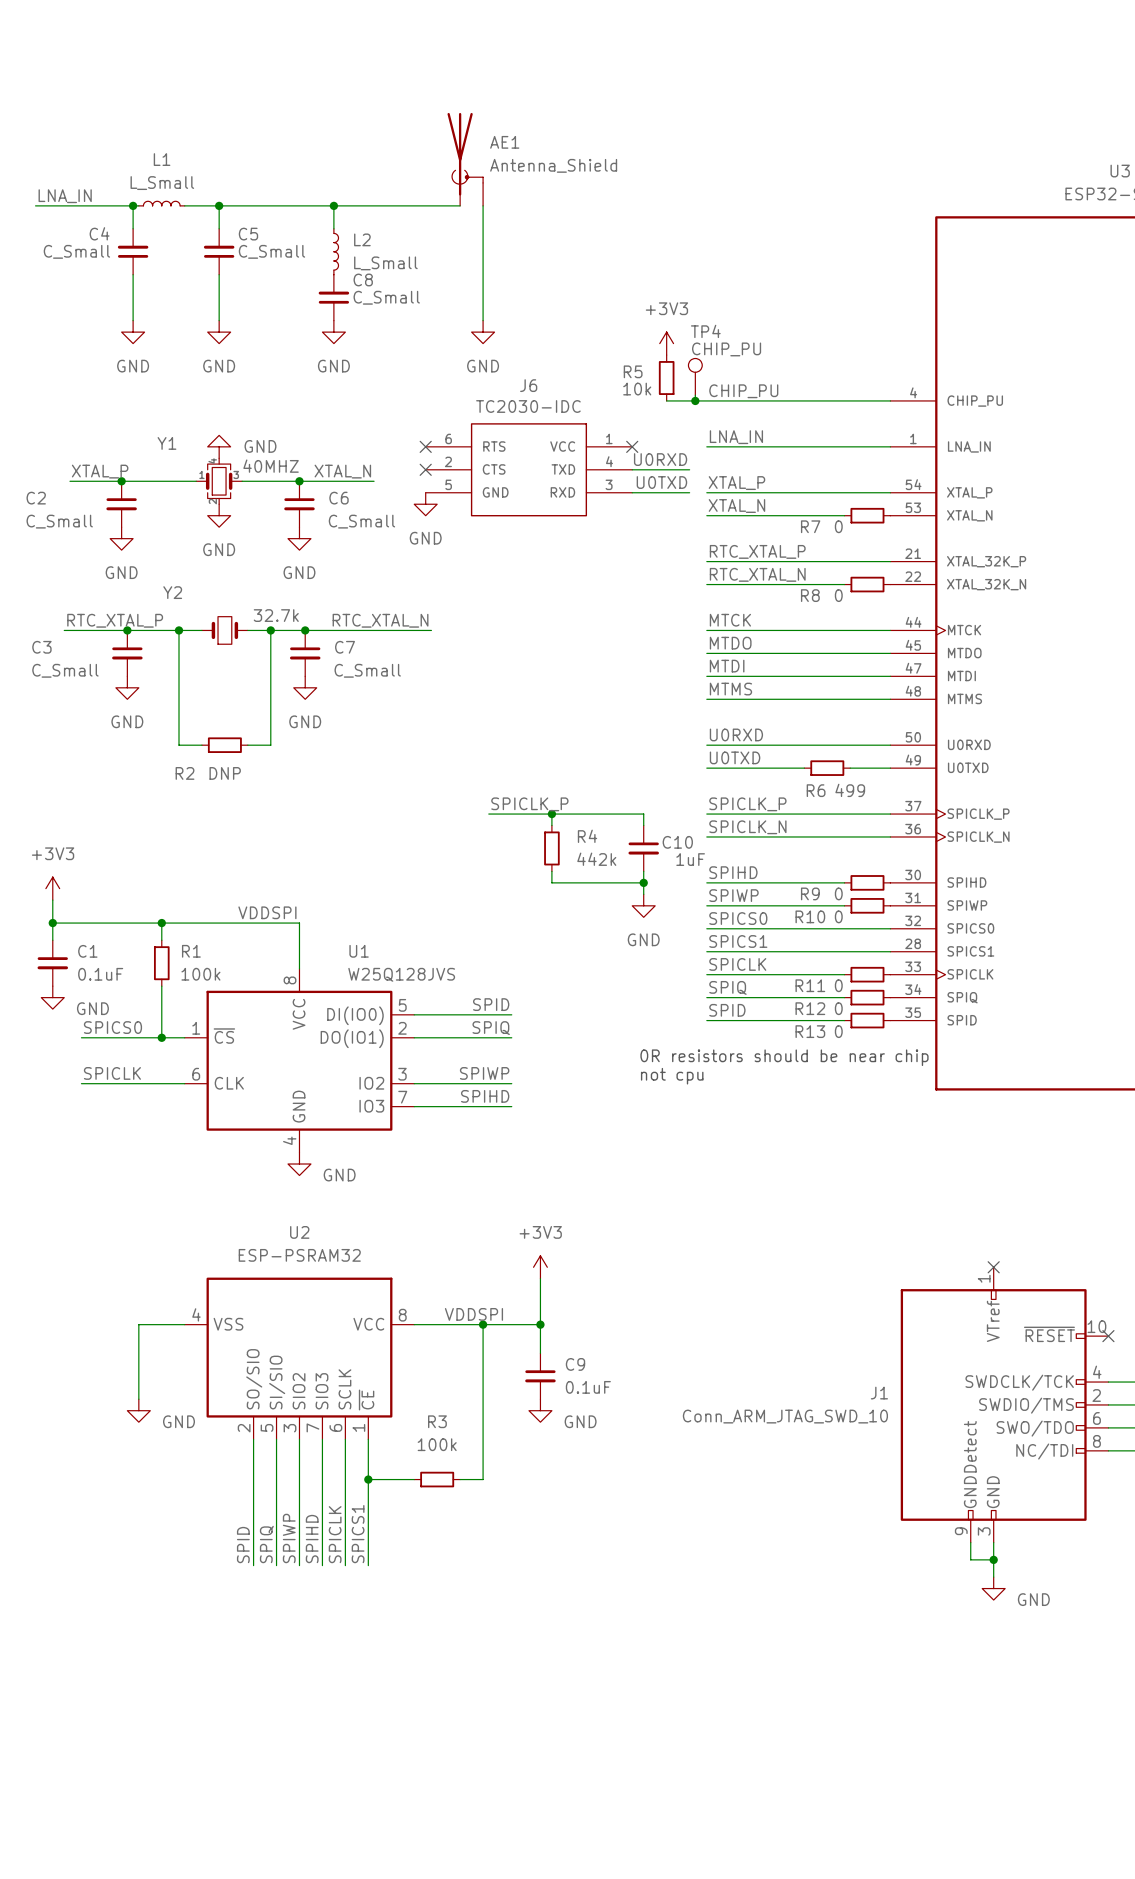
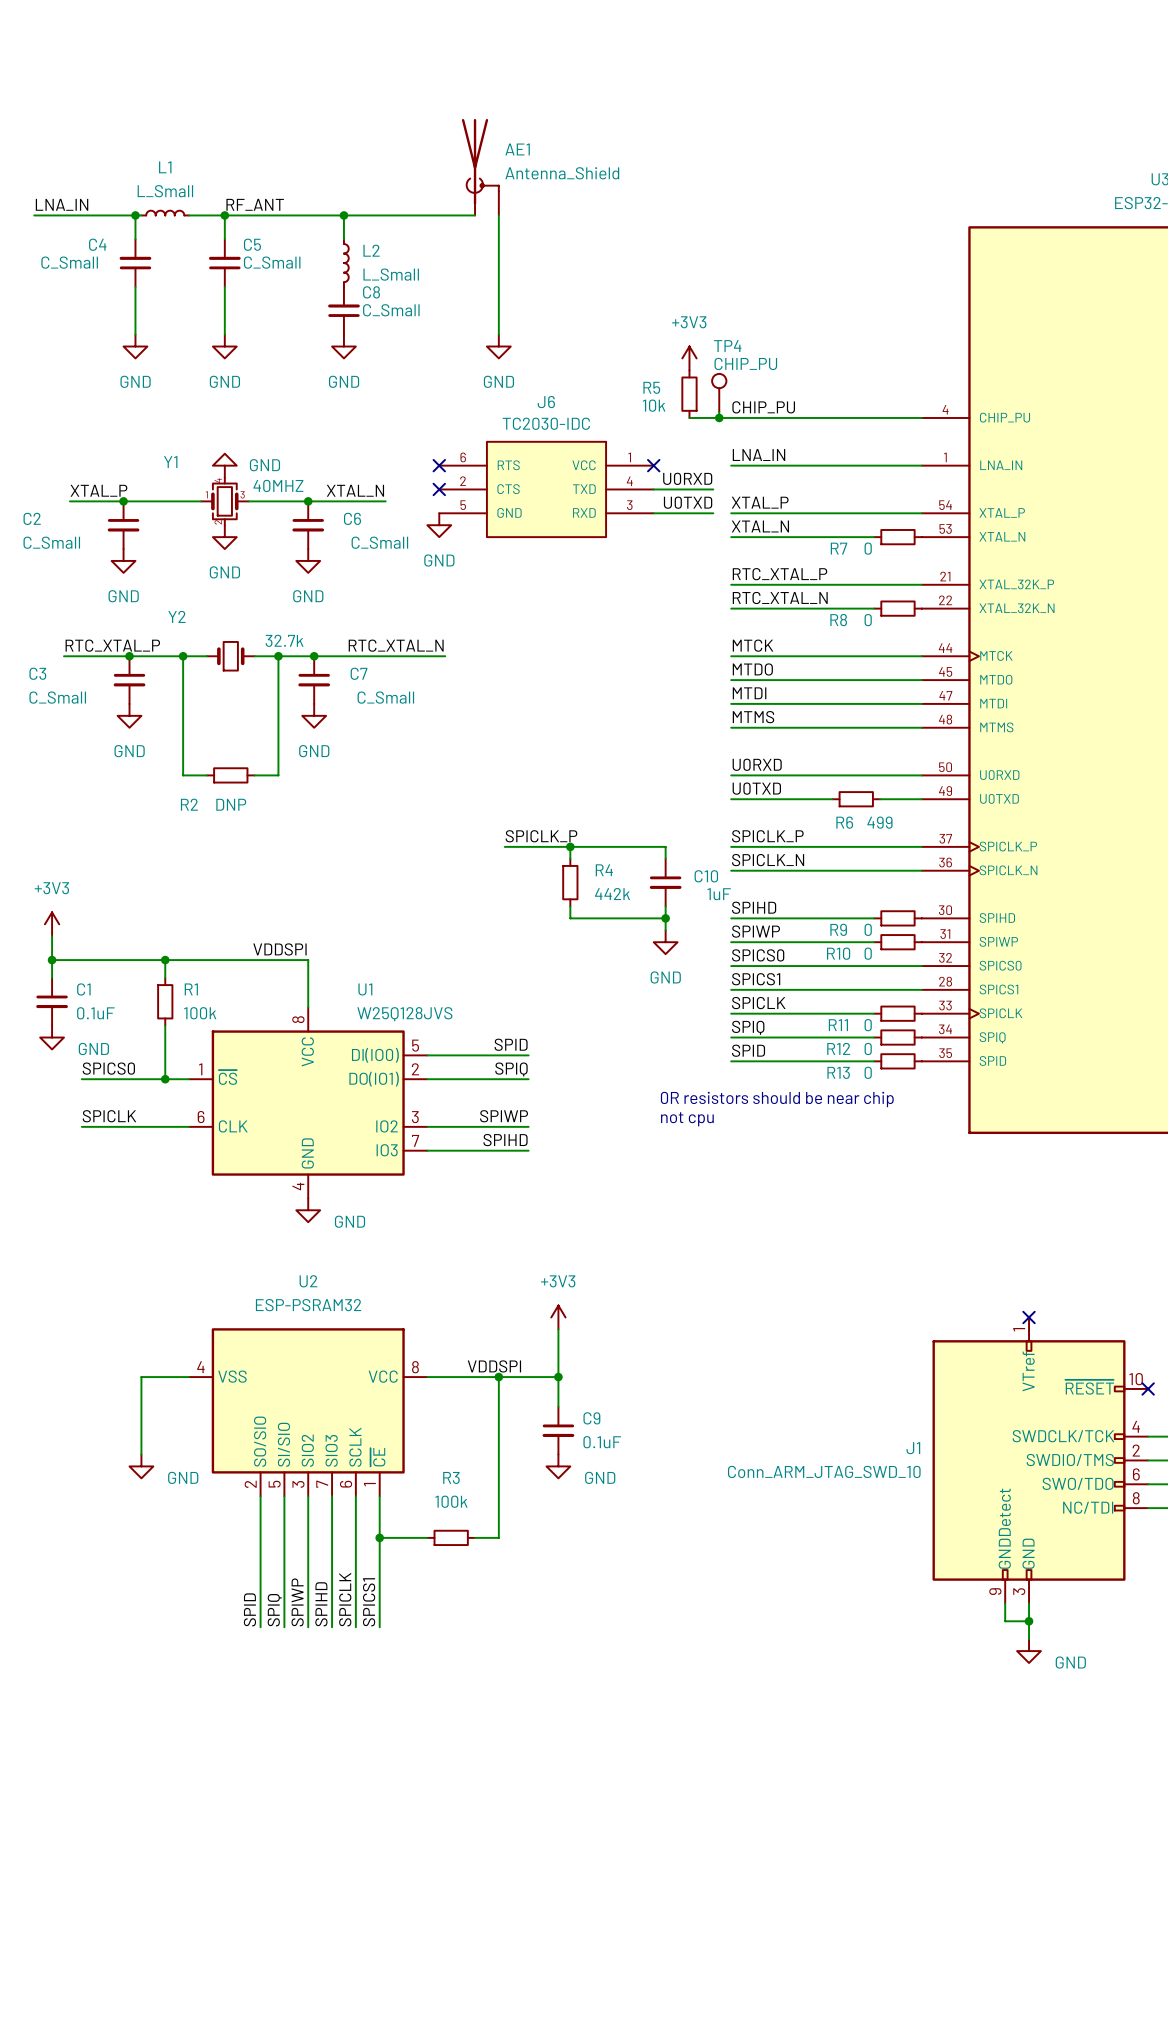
label: none -> RF_ANT (255, 204)

